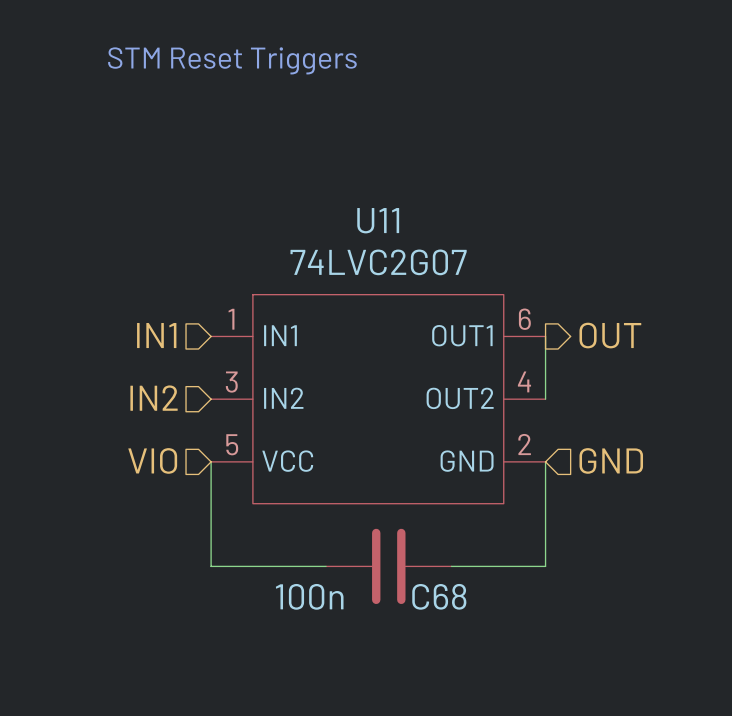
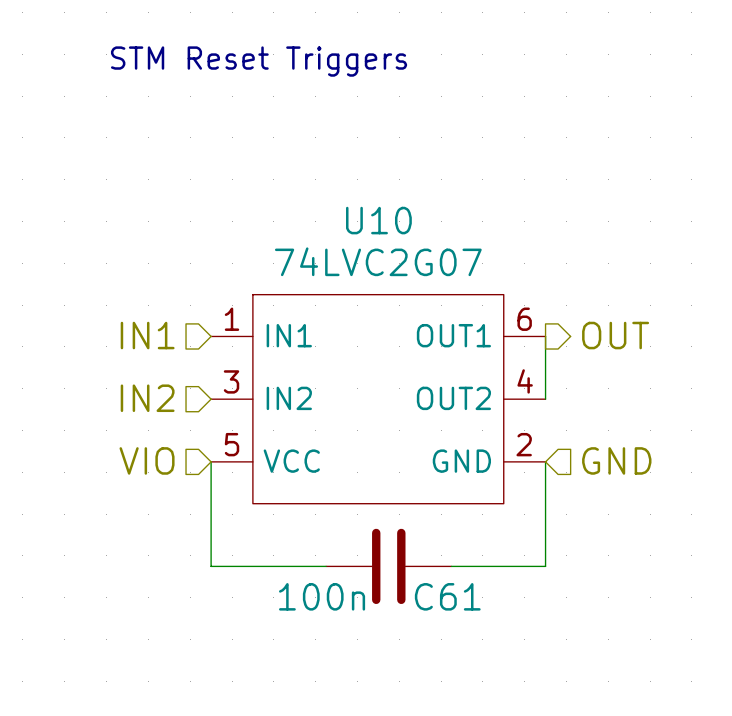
U11 name: U11 (378, 220) -> U10 (378, 220)
C68 name: C68 (439, 596) -> C61 (447, 596)

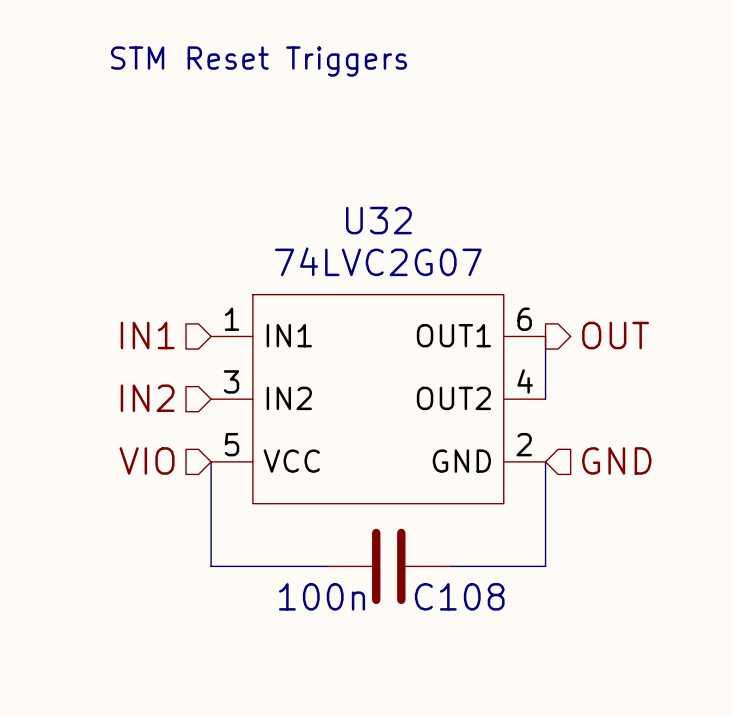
U10 name: U10 (378, 220) -> U32 (378, 220)
C61 name: C61 (447, 596) -> C108 (459, 596)

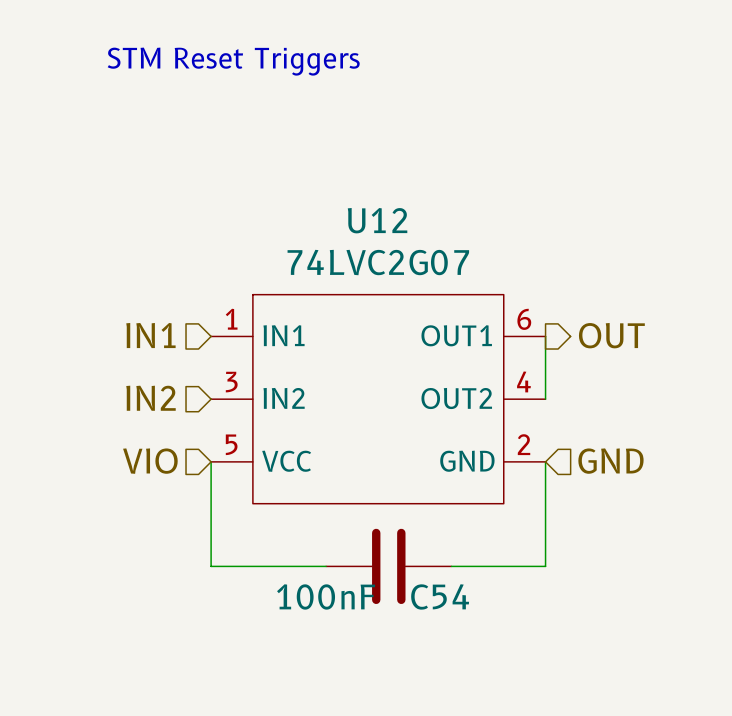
U32 name: U32 (378, 220) -> U12 (377, 220)
C108 value: 100n (322, 596) -> 100nF (326, 596)
C108 name: C108 (459, 596) -> C54 (440, 596)

